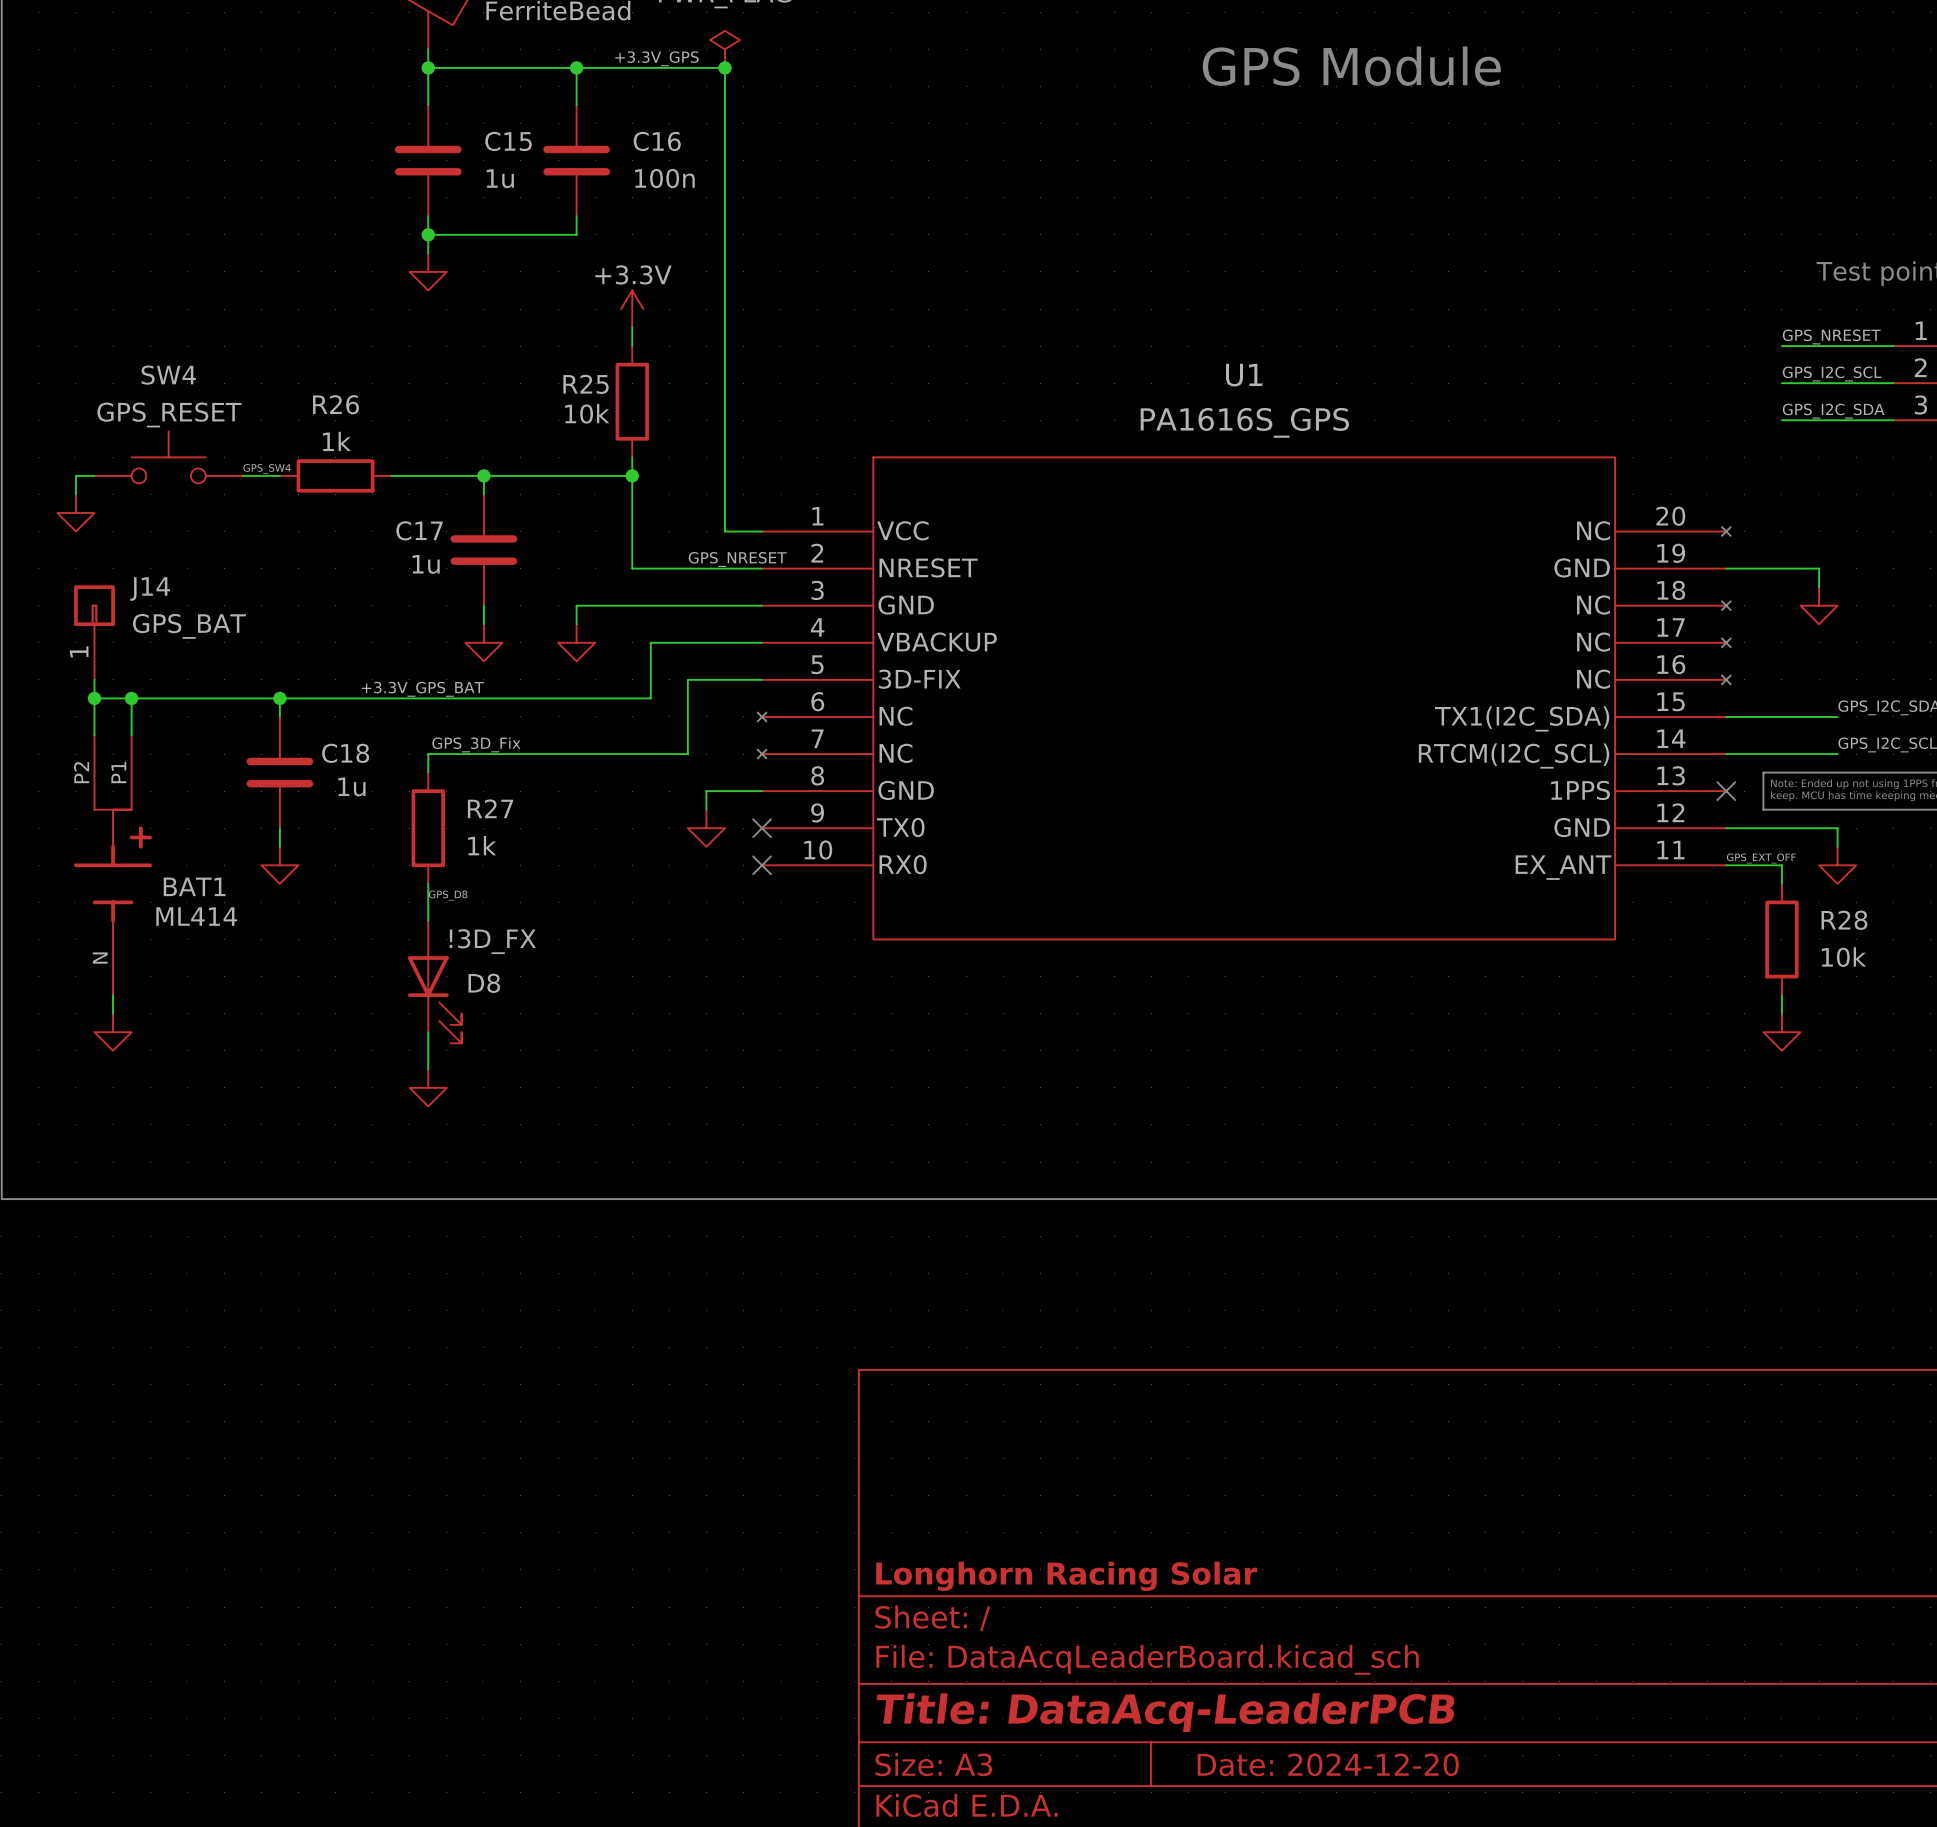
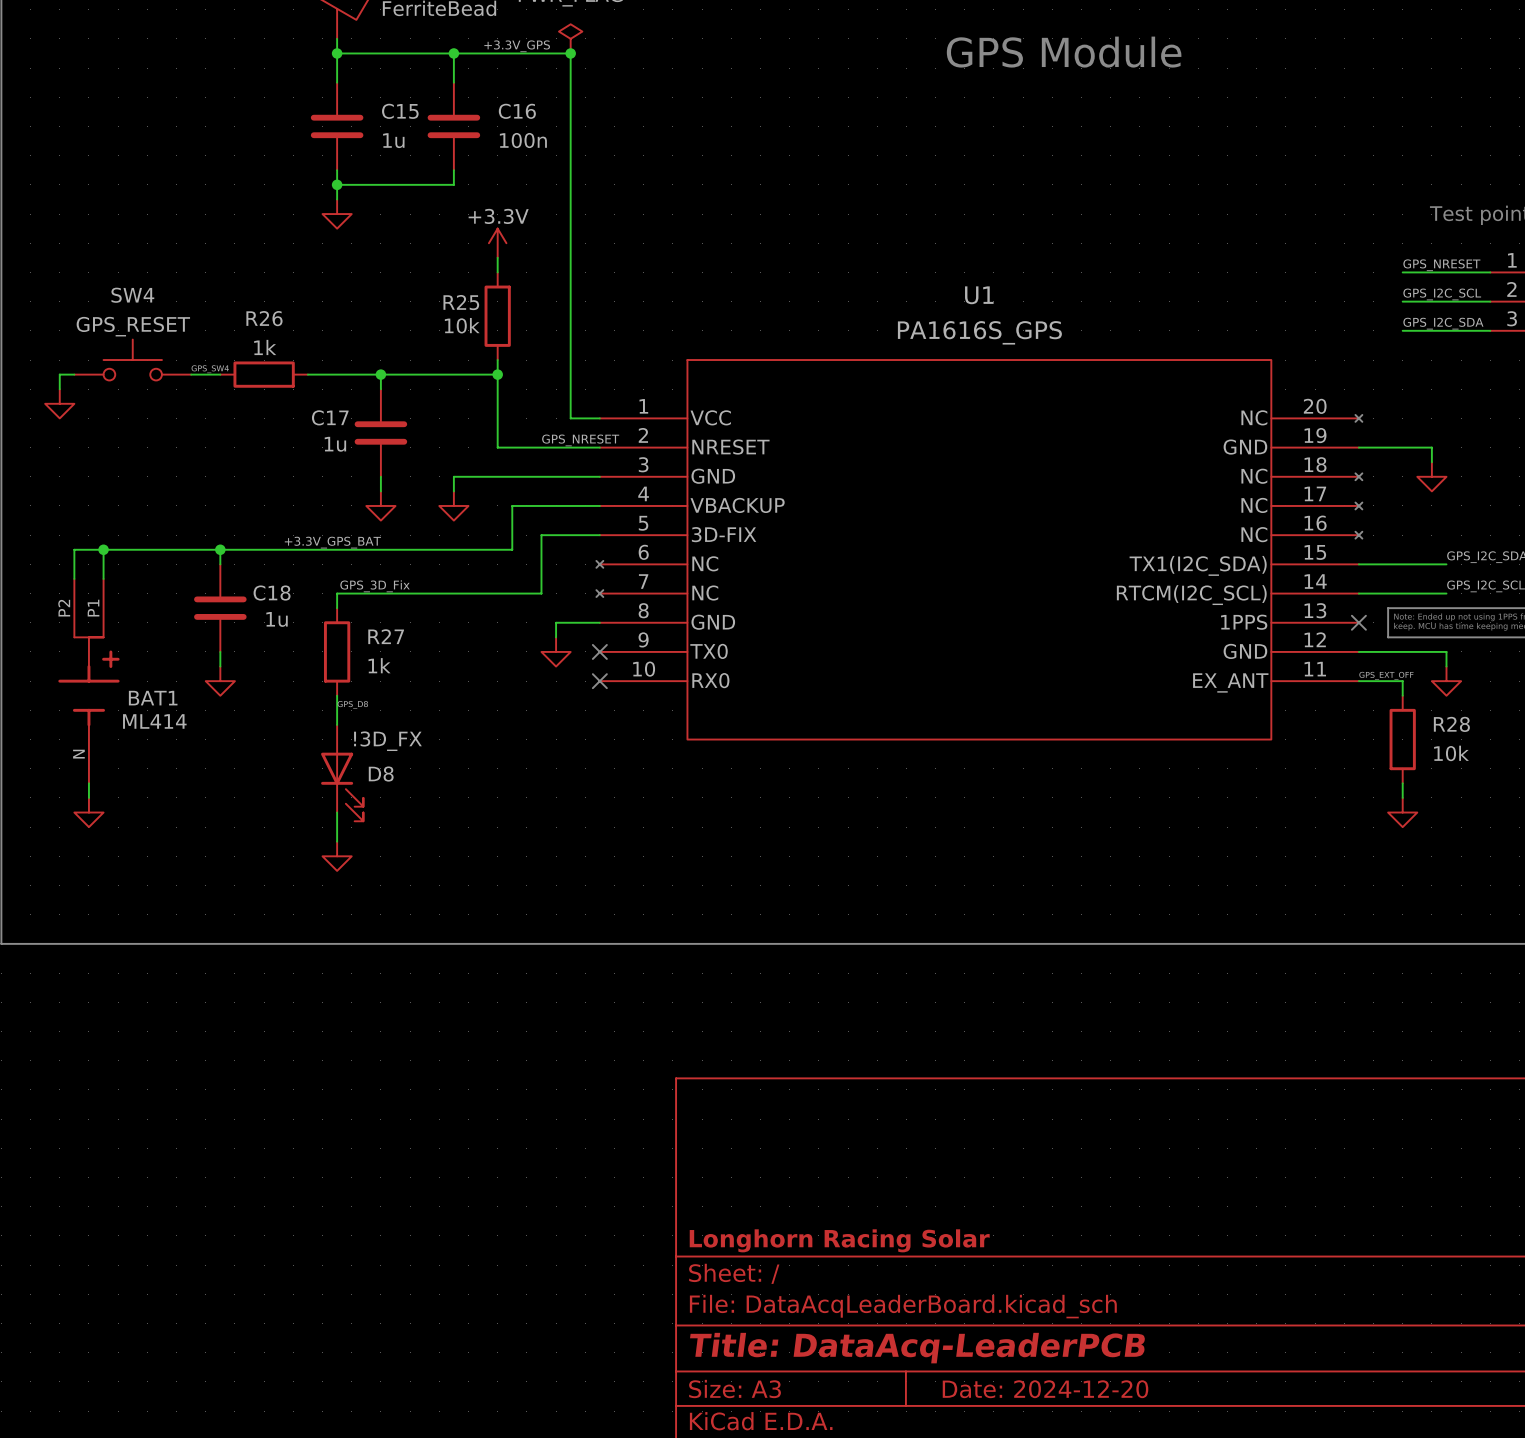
J14: GPS_BAT (94, 632) -> none
wire: (94, 679) (94, 698) -> none
junction: (94, 698) -> none

